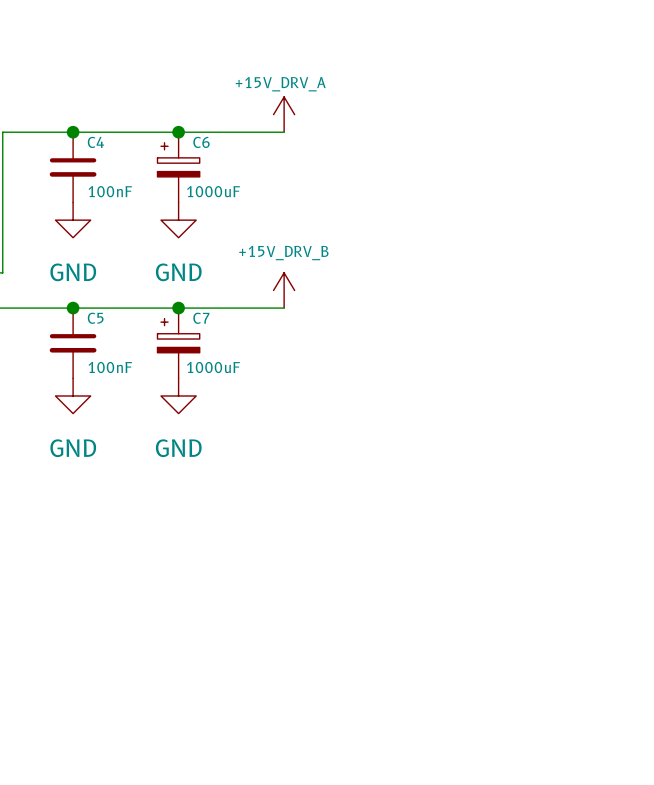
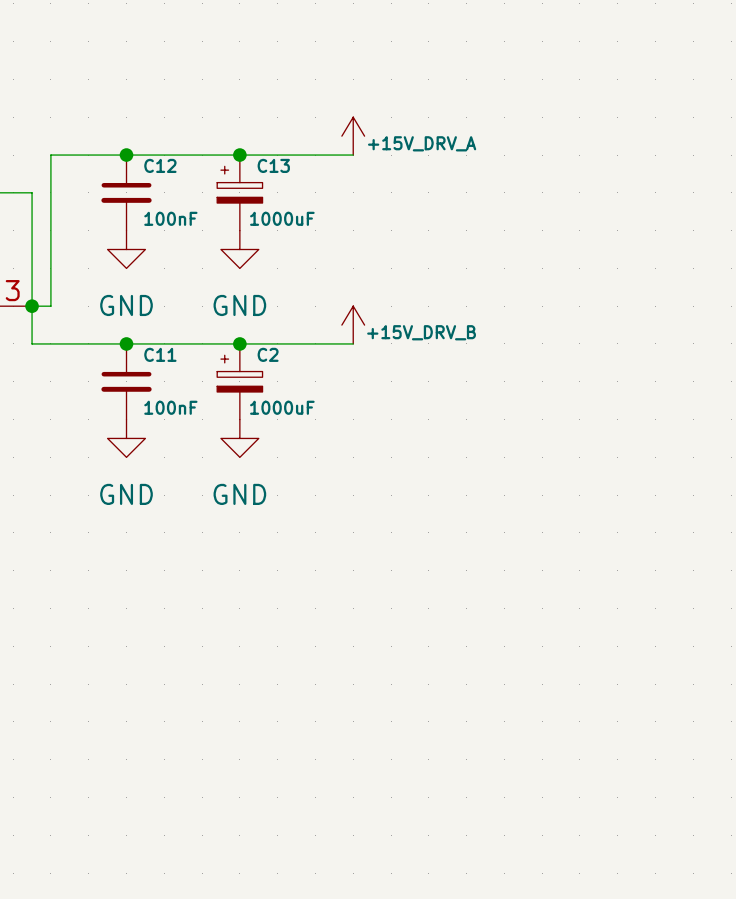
power symbol text position: +15V_DRV_A (280, 84) -> +15V_DRV_A (422, 143)
C4 name: C4 (95, 142) -> C12 (160, 165)
C6 name: C6 (201, 142) -> C13 (273, 165)
power symbol text position: +15V_DRV_B (283, 253) -> +15V_DRV_B (421, 332)
C5 name: C5 (95, 318) -> C11 (160, 354)
C7 name: C7 (201, 318) -> C2 (268, 354)

